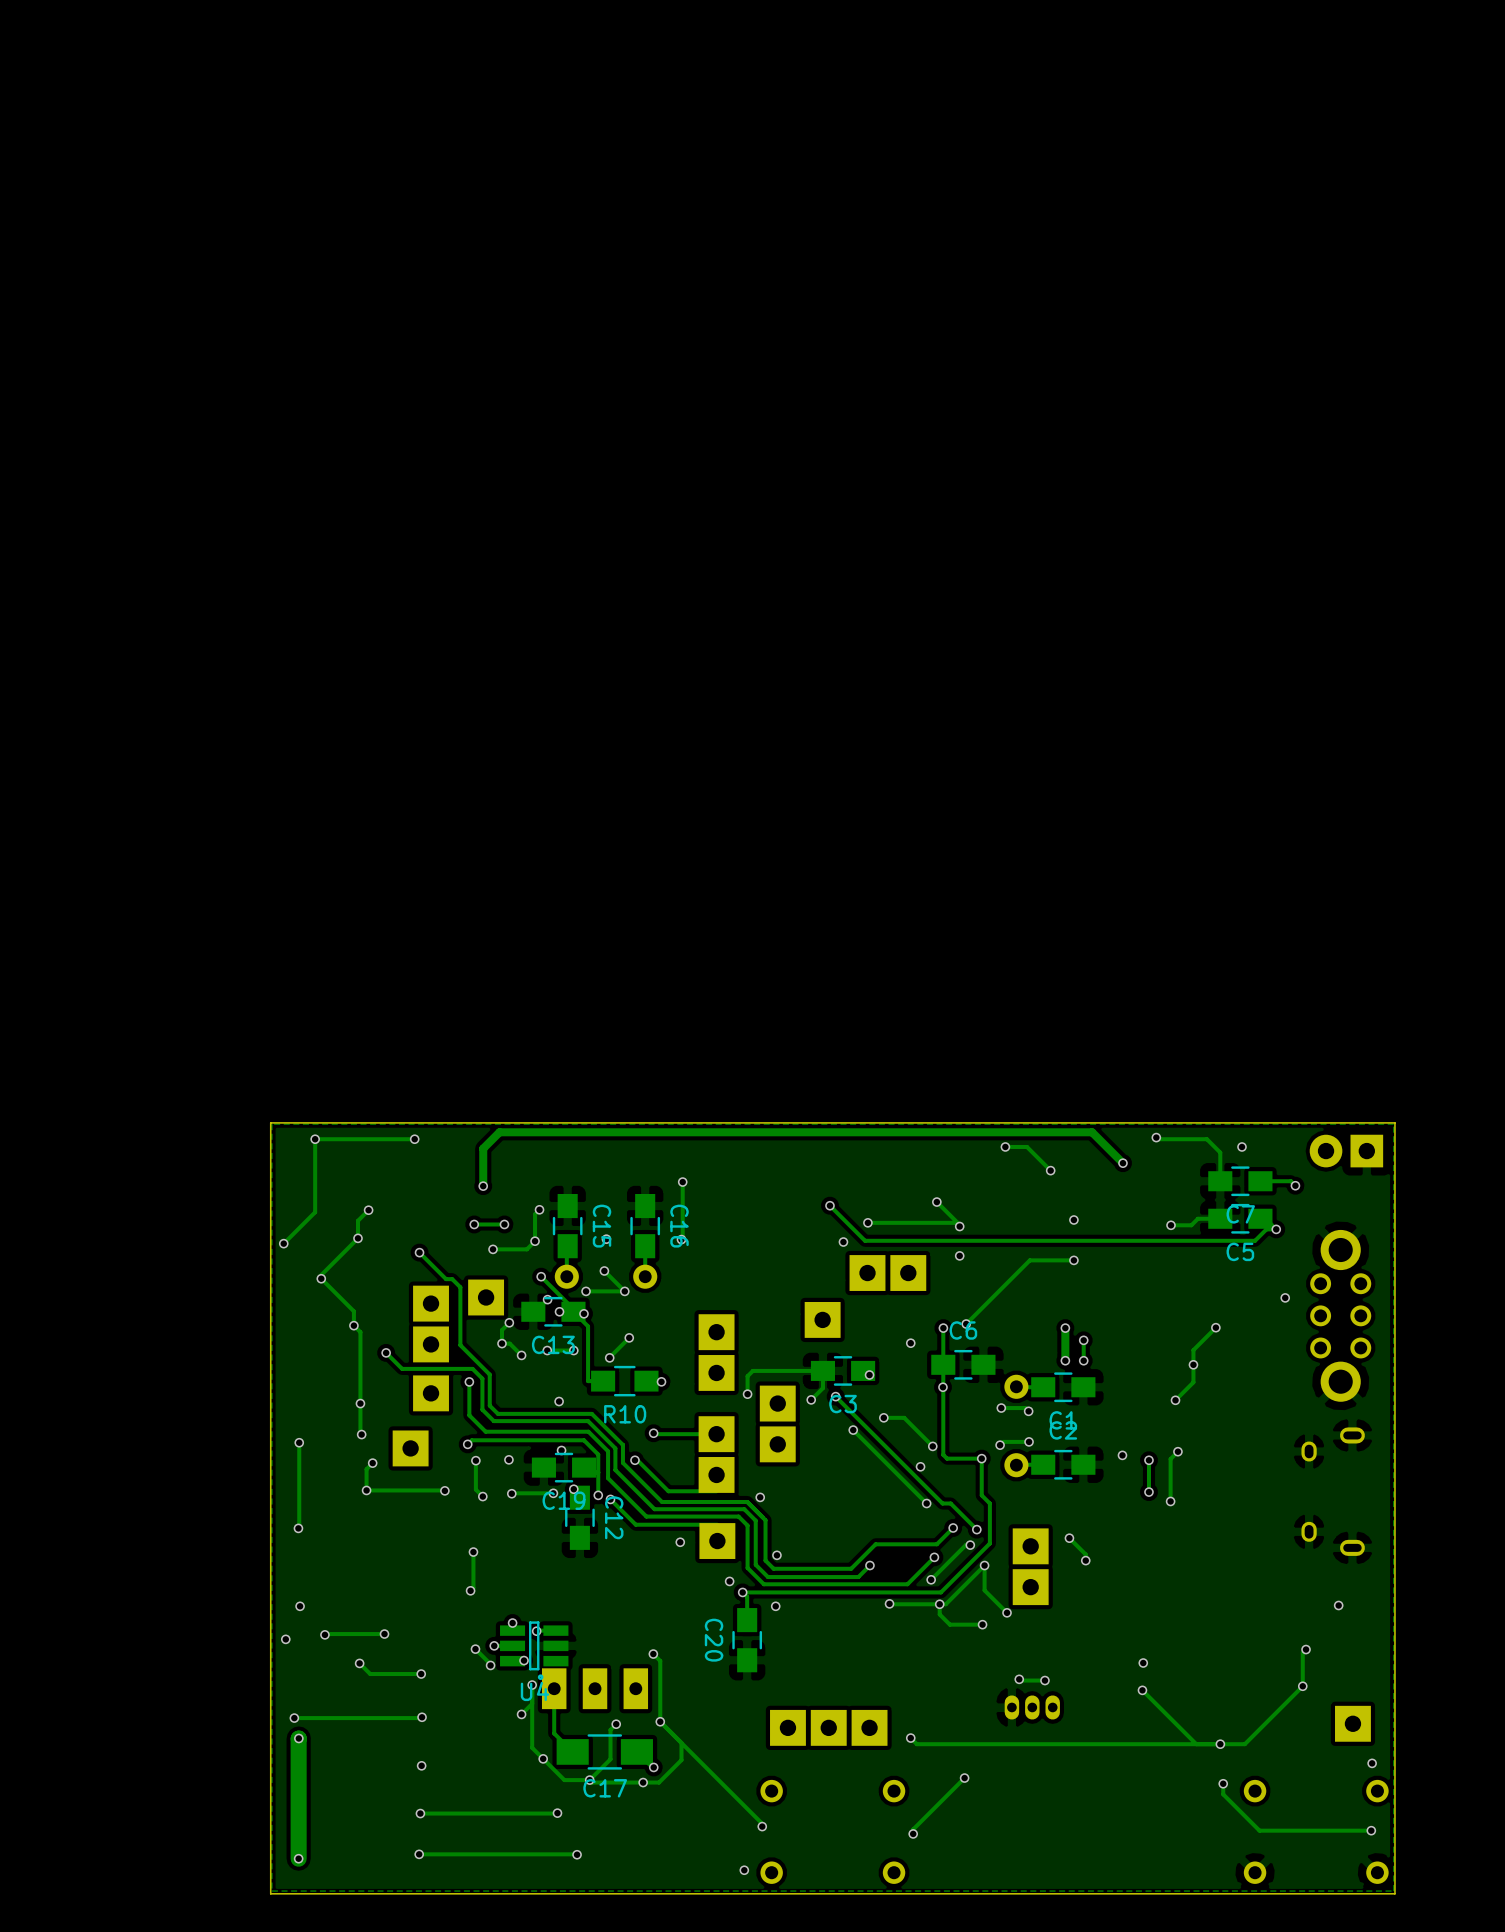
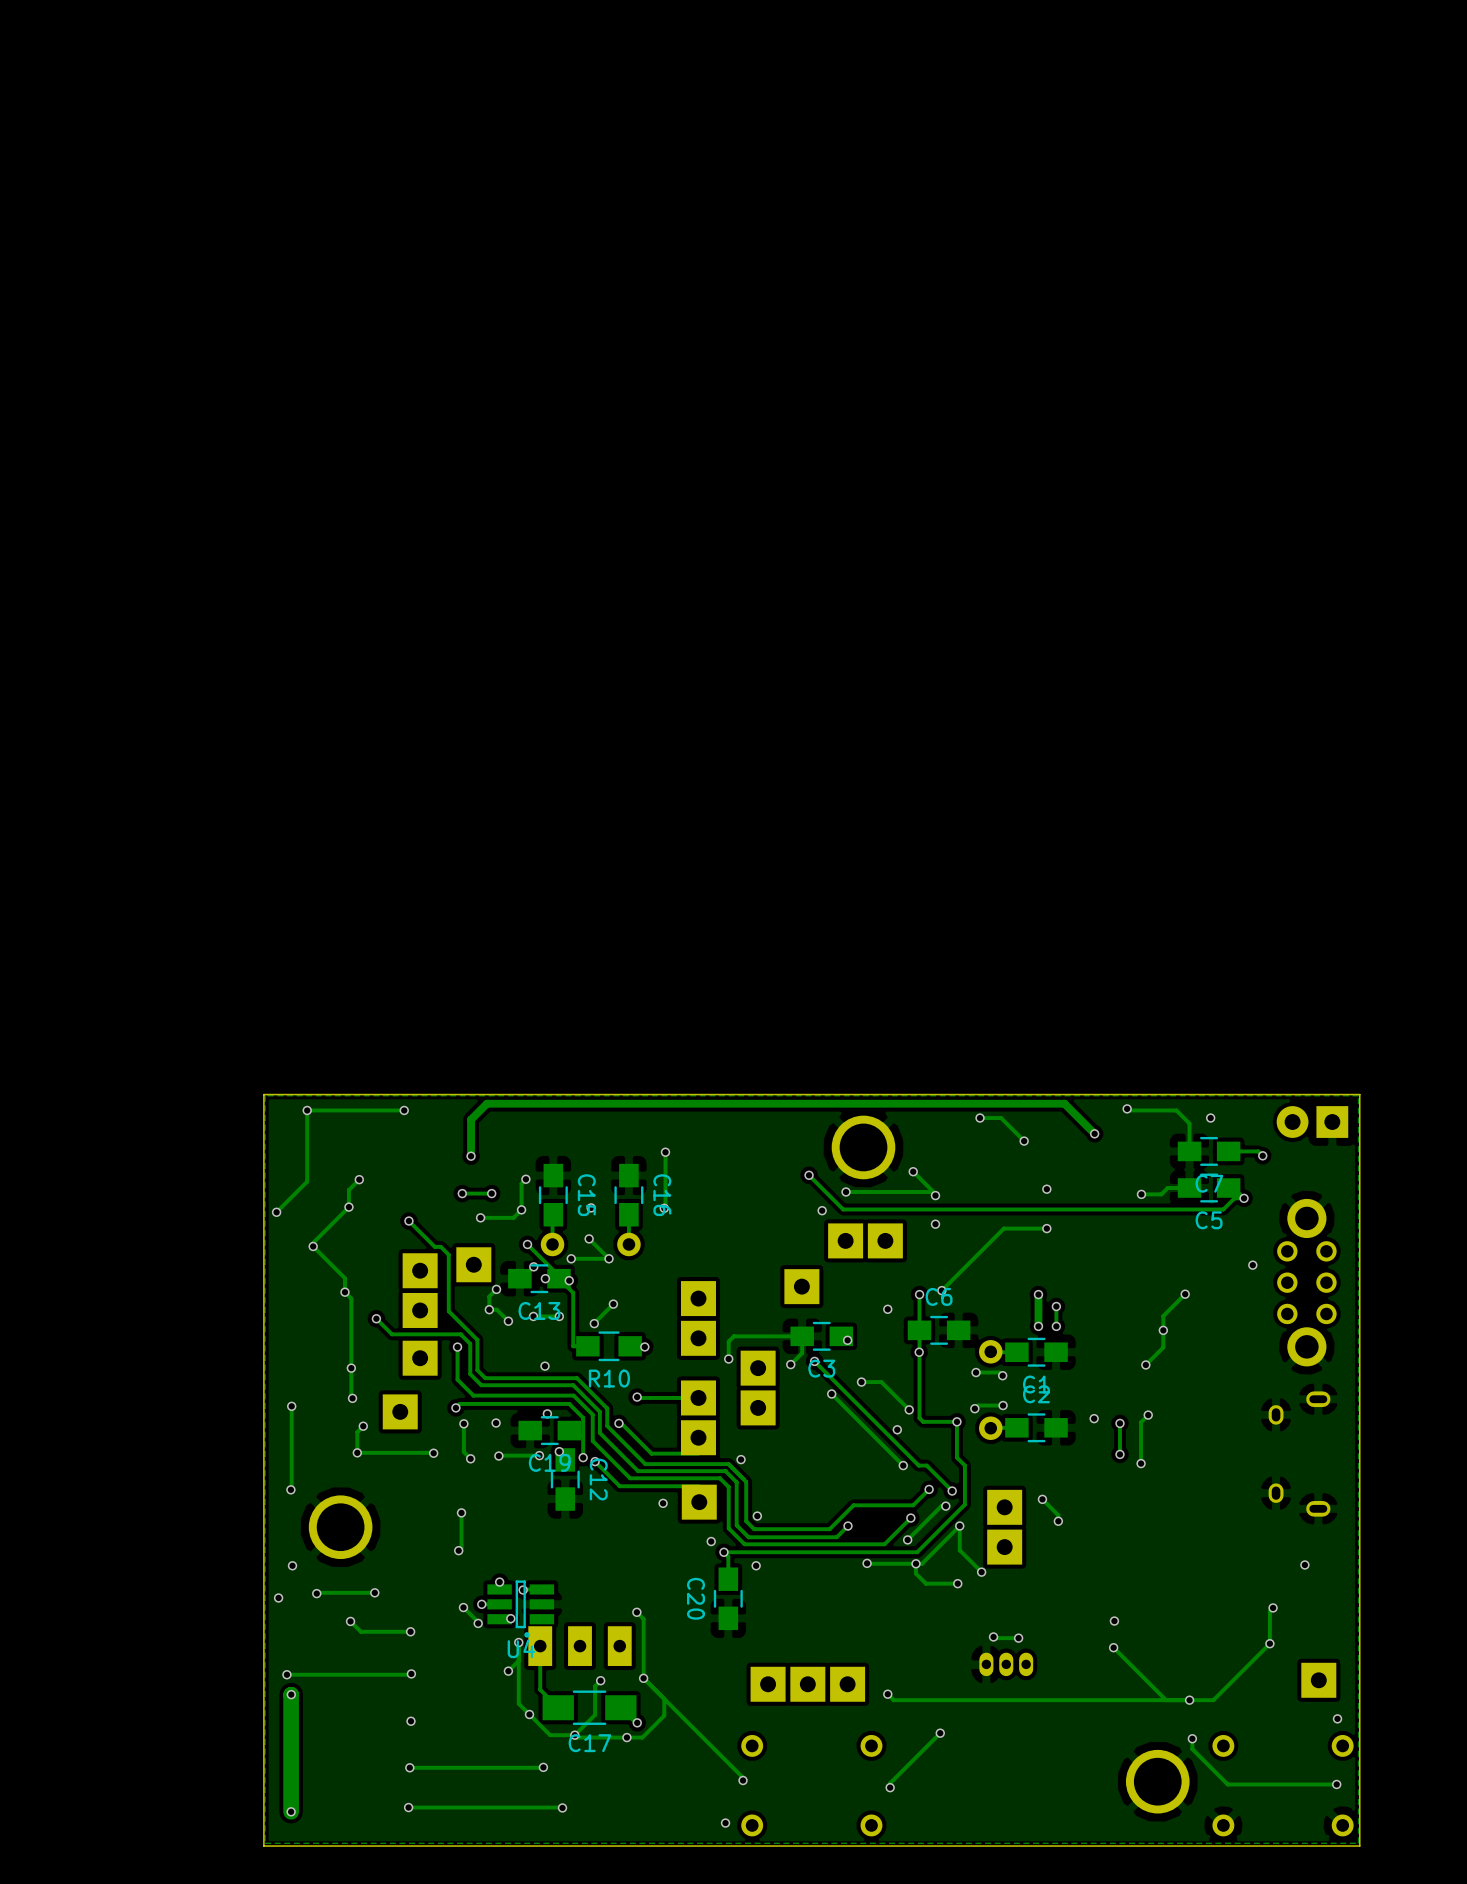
part: none -> (863, 1147)
part: none -> (340, 1527)
part: none -> (1157, 1781)

